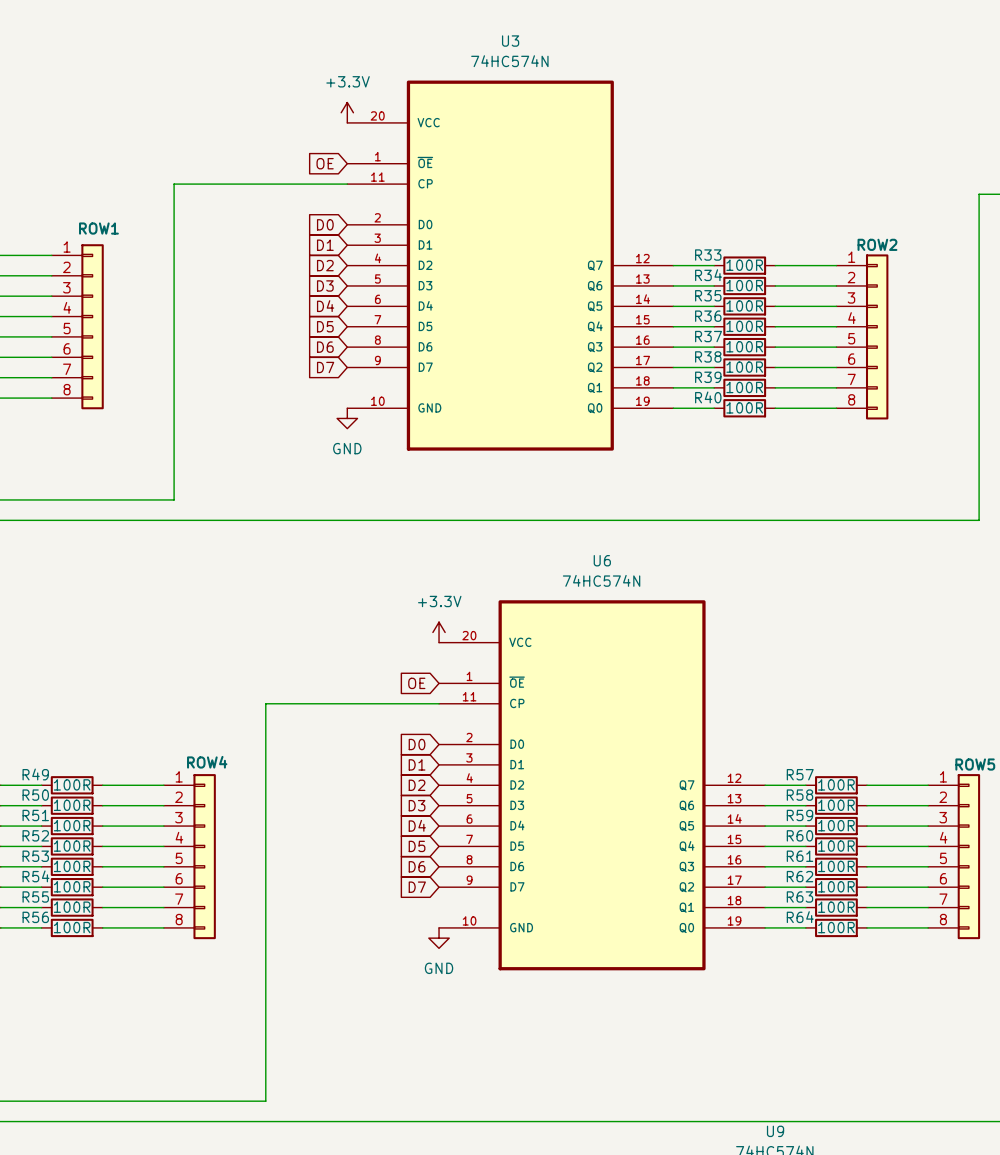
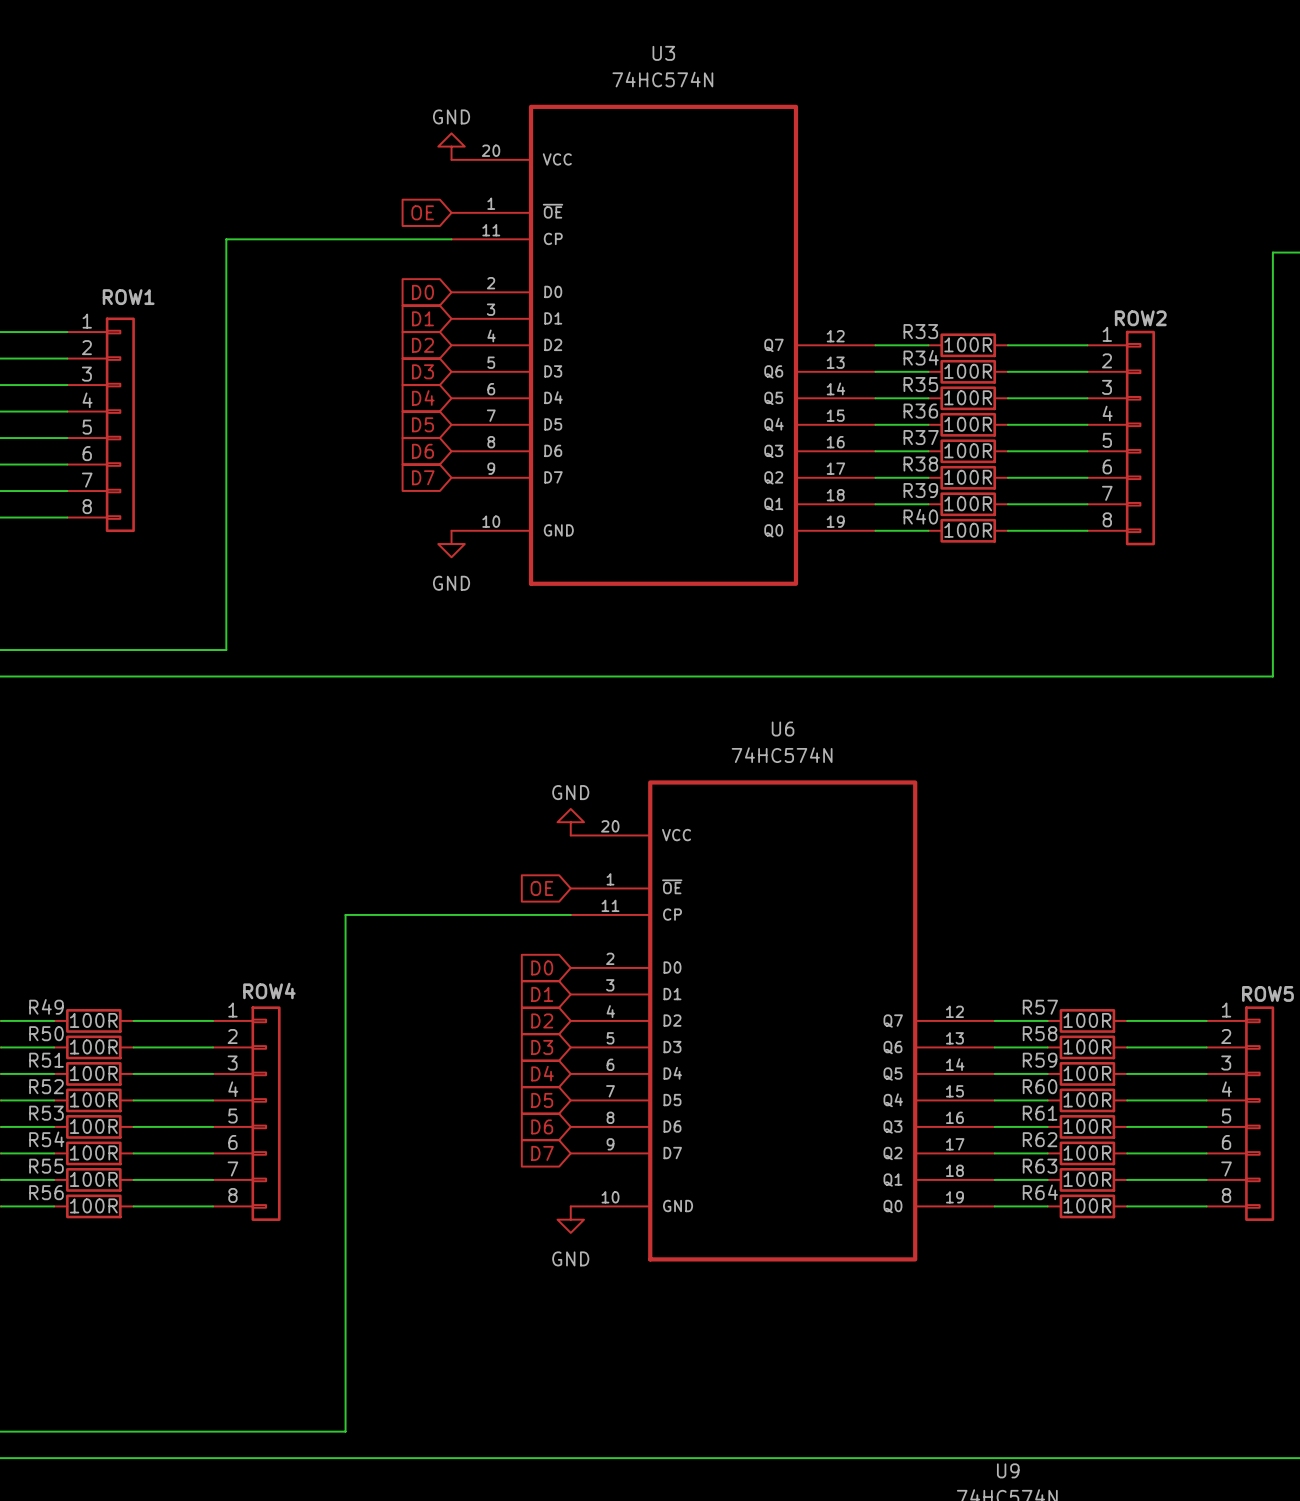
power symbol: +3.3V (347, 112) -> GND (451, 146)
power symbol: +3.3V (439, 632) -> GND (570, 822)

